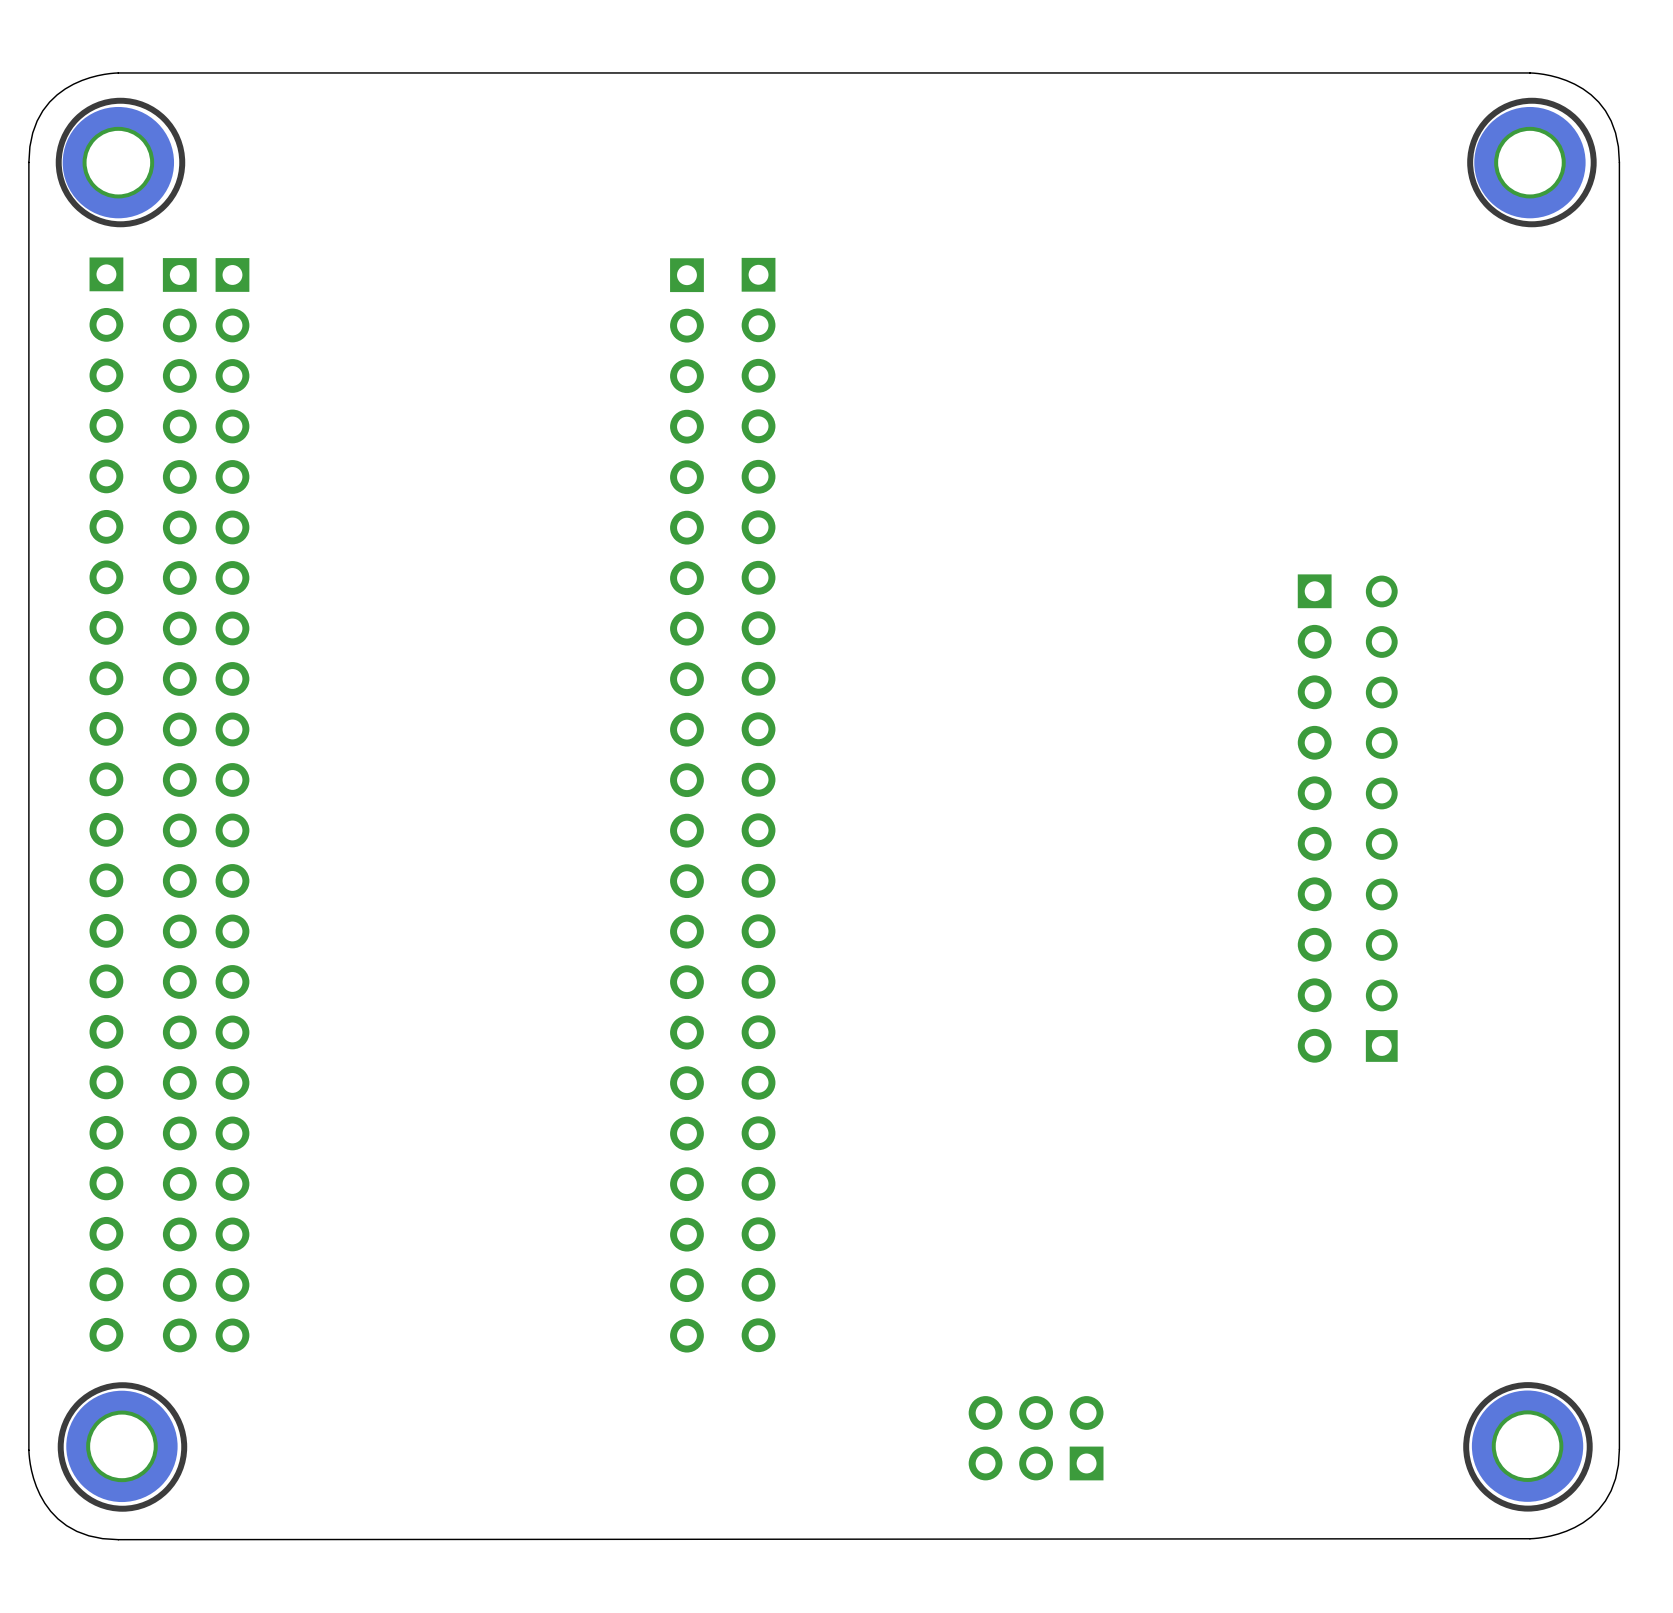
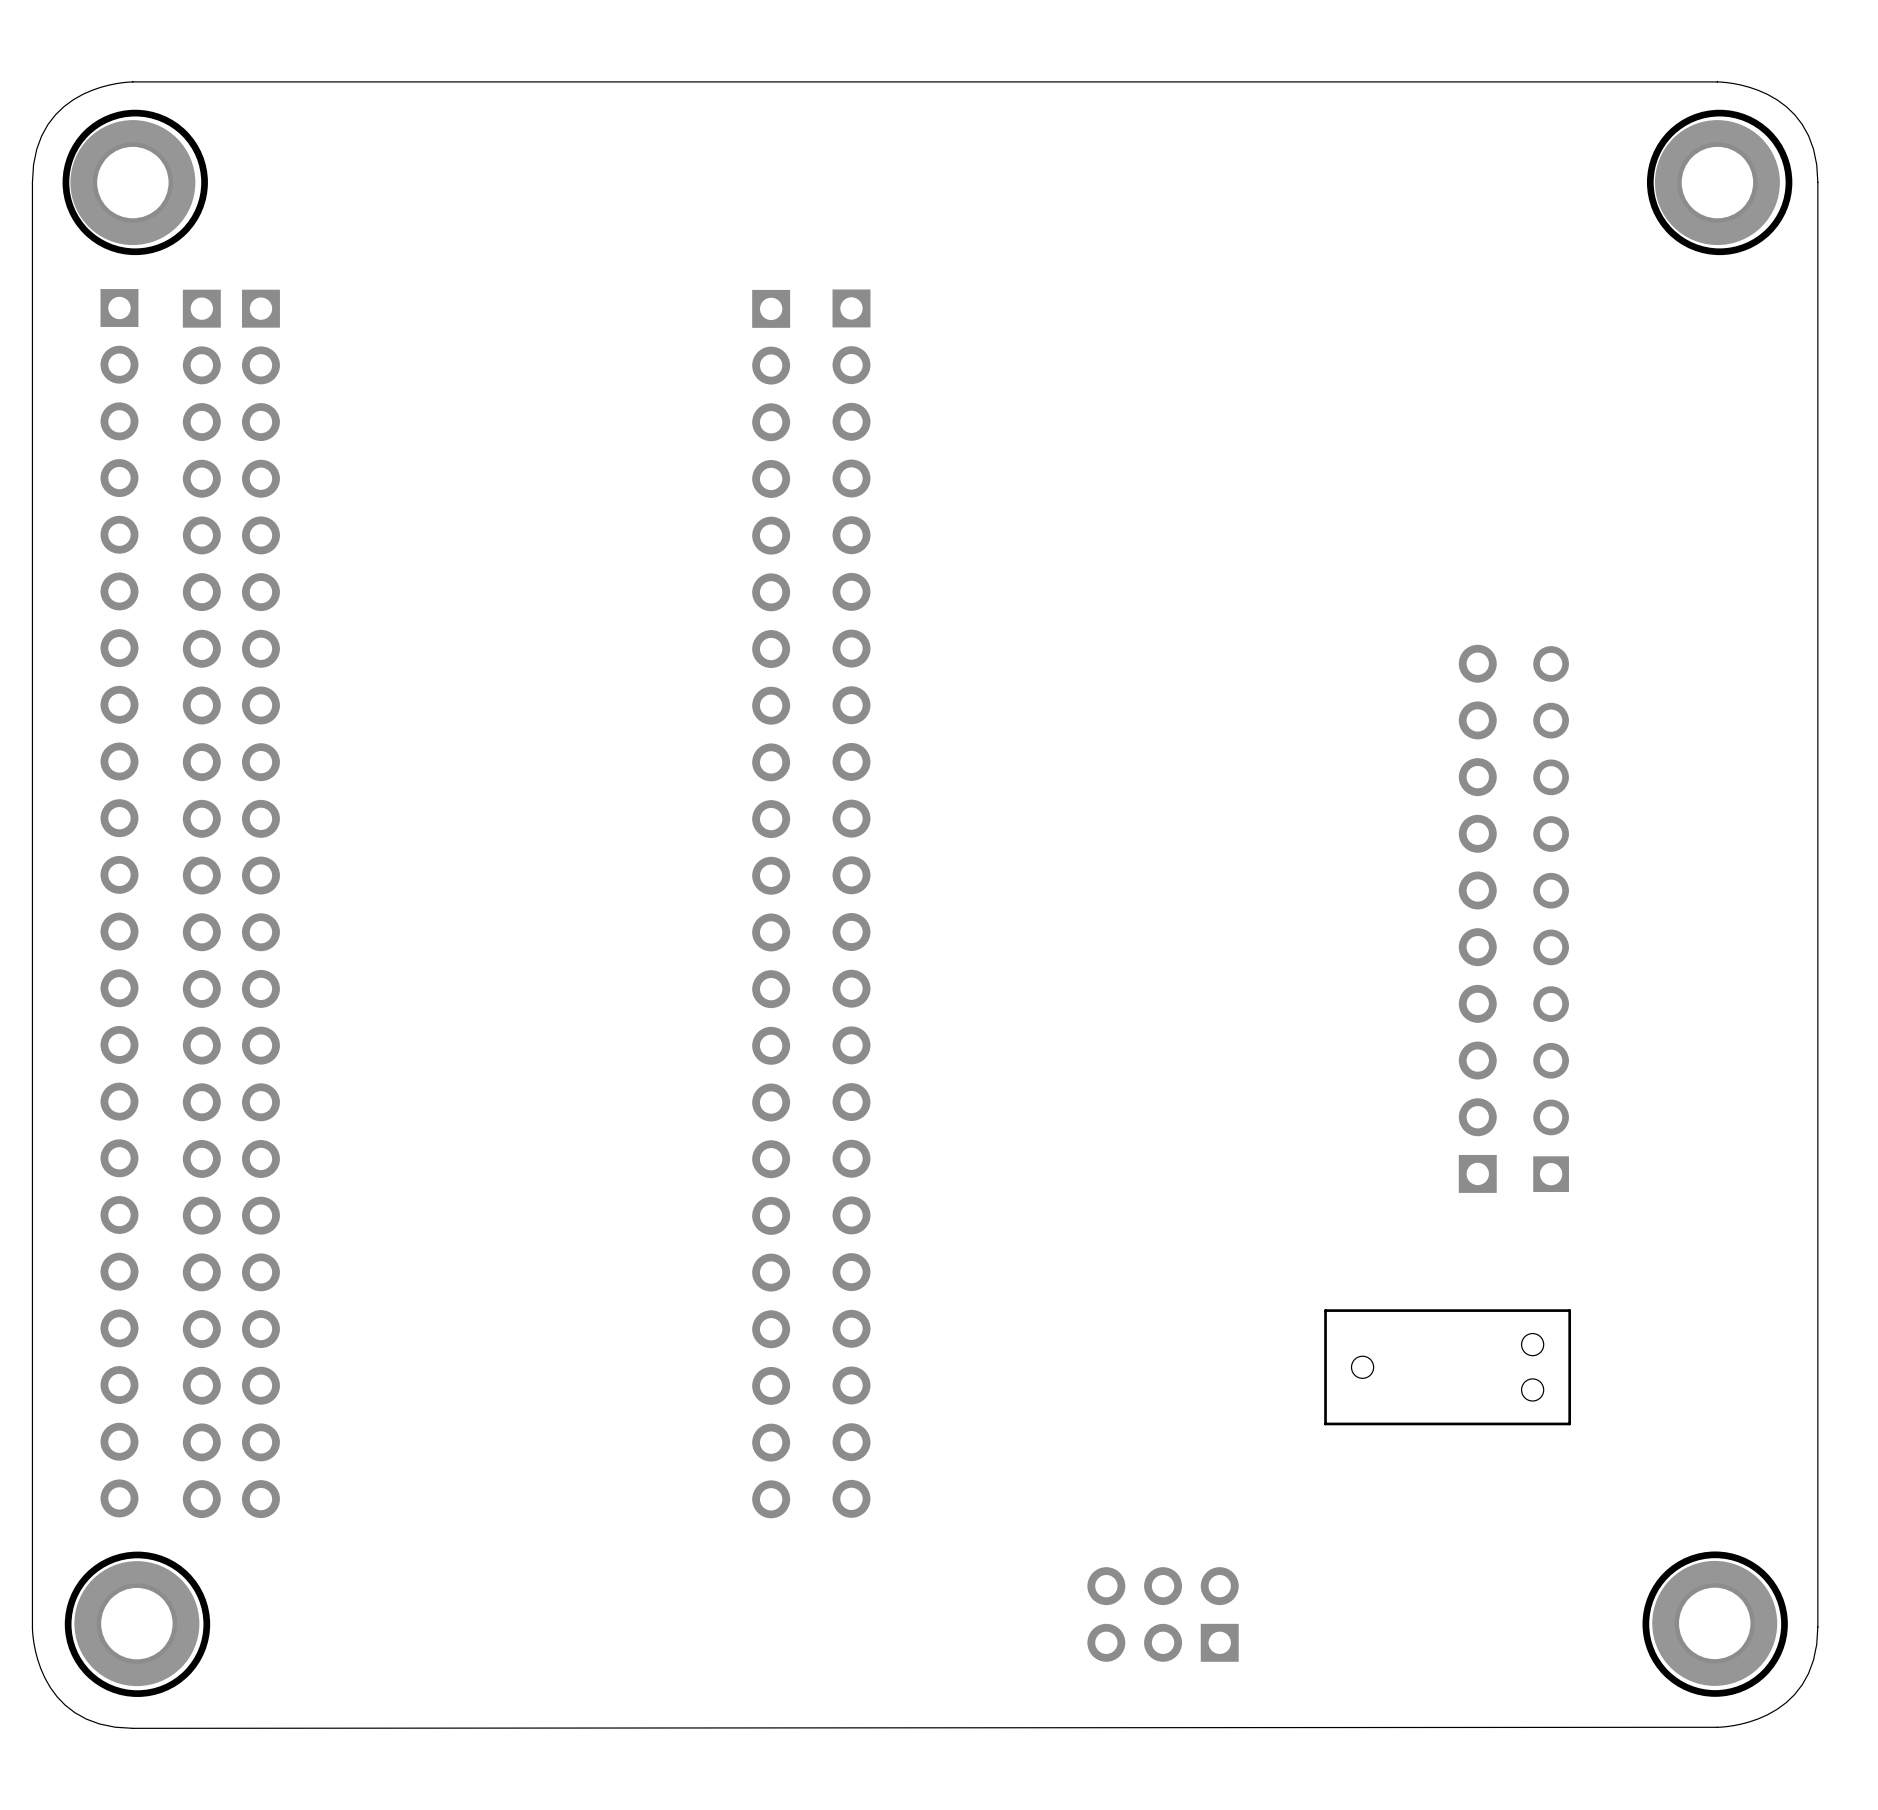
part rotation: 0° (1314, 818) -> 180° (1477, 918)
part: none -> (1447, 1367)

